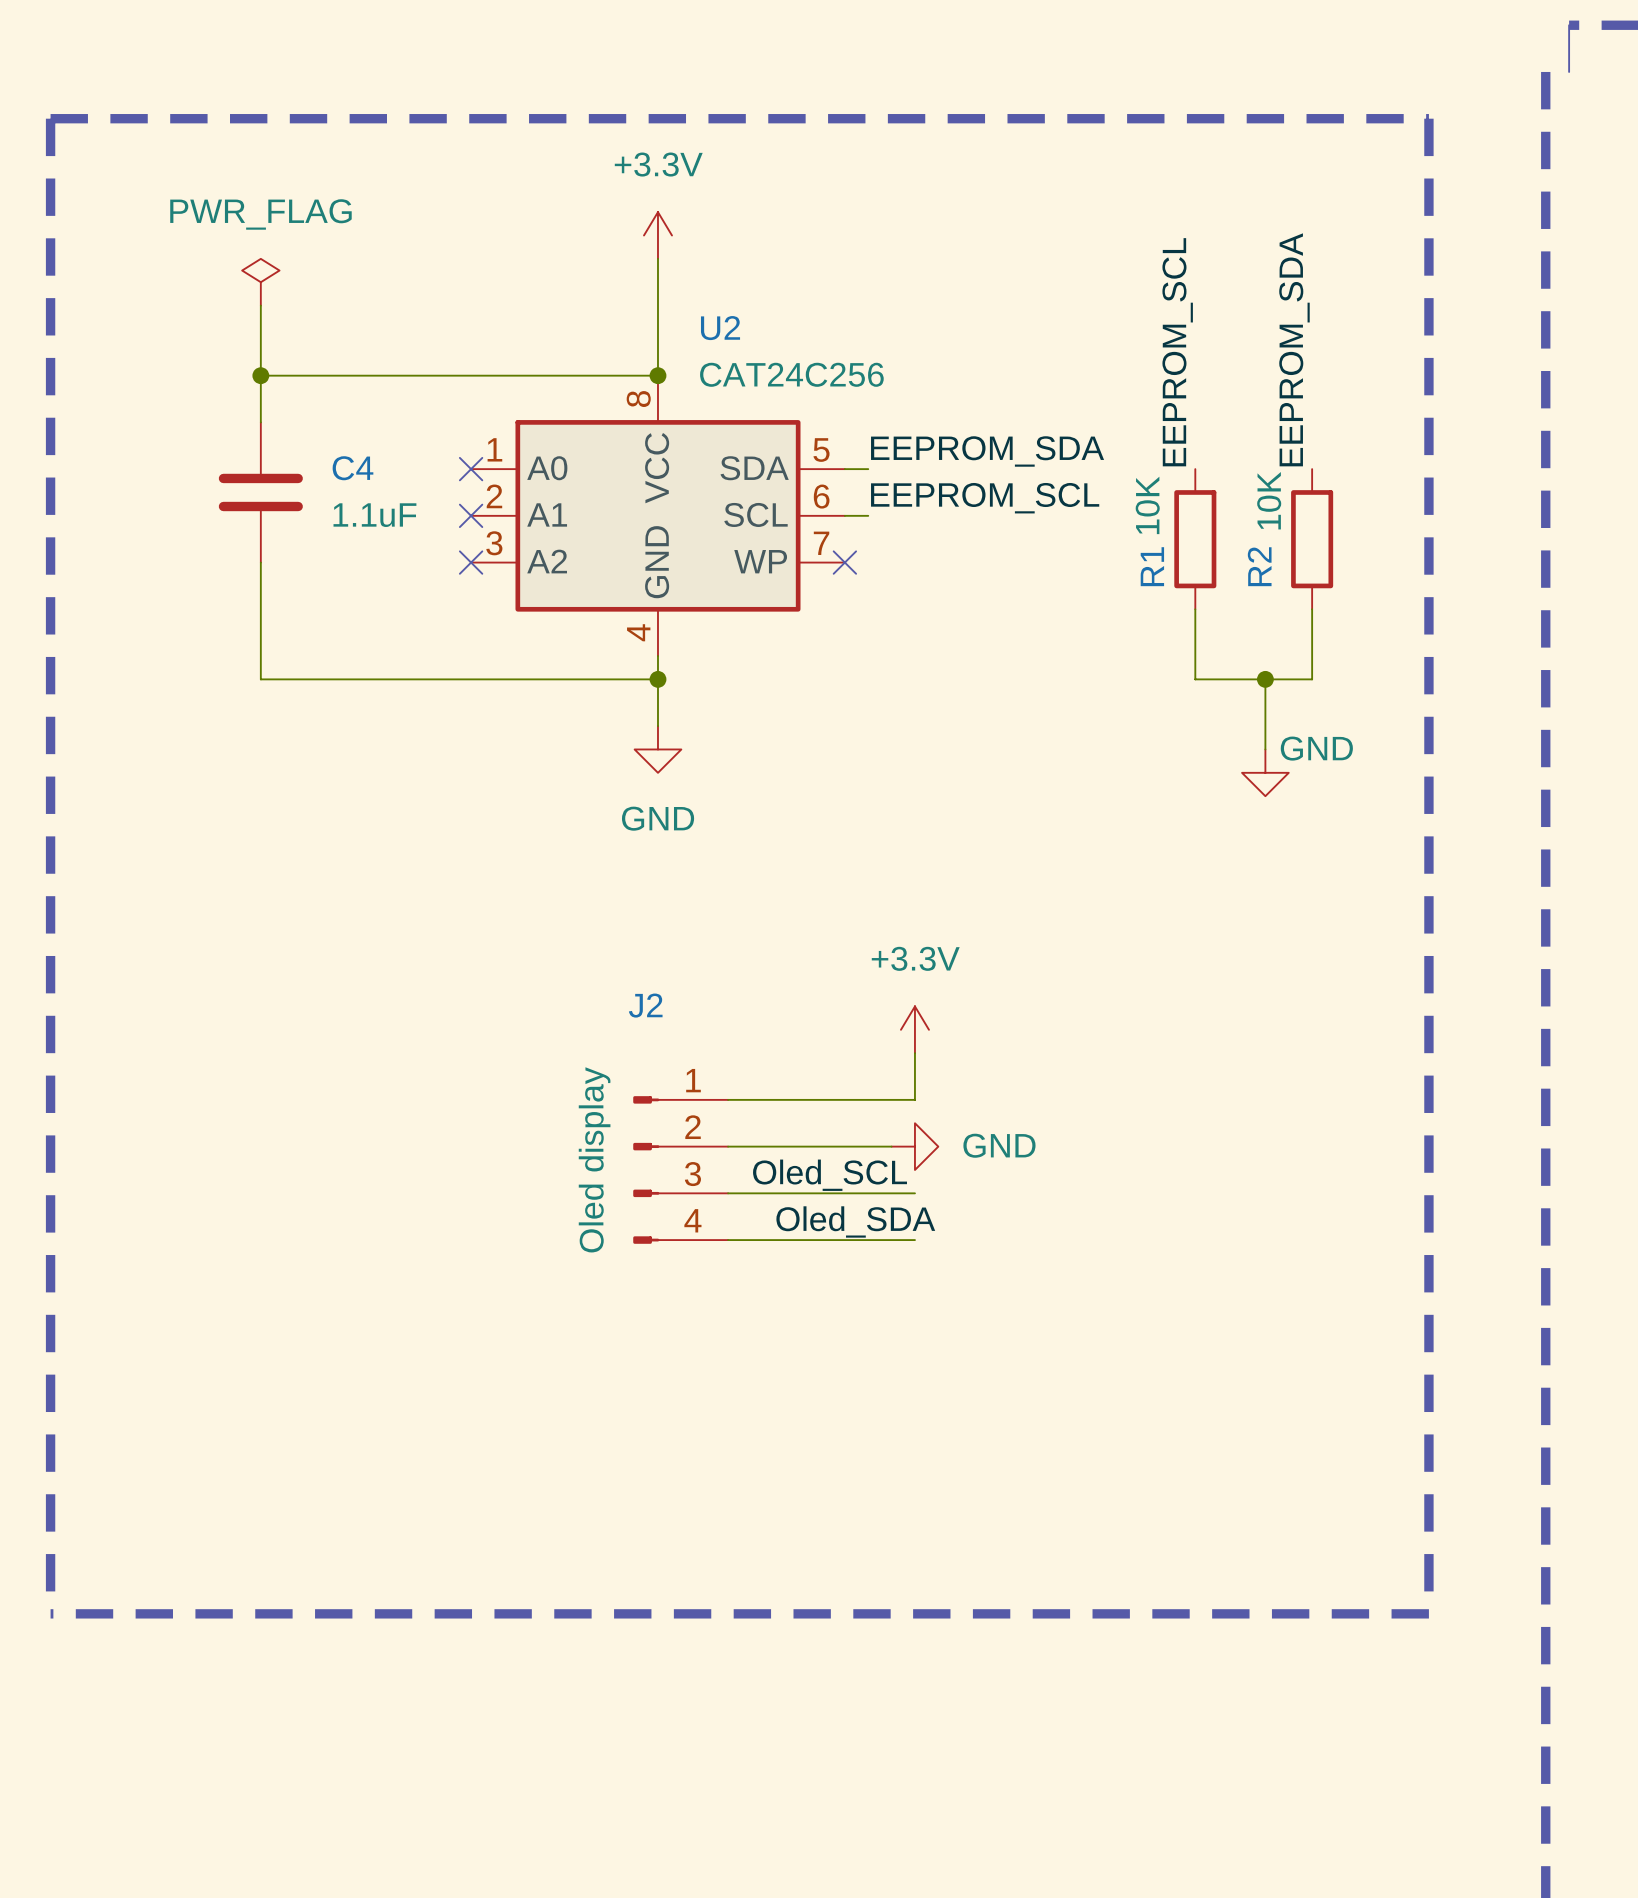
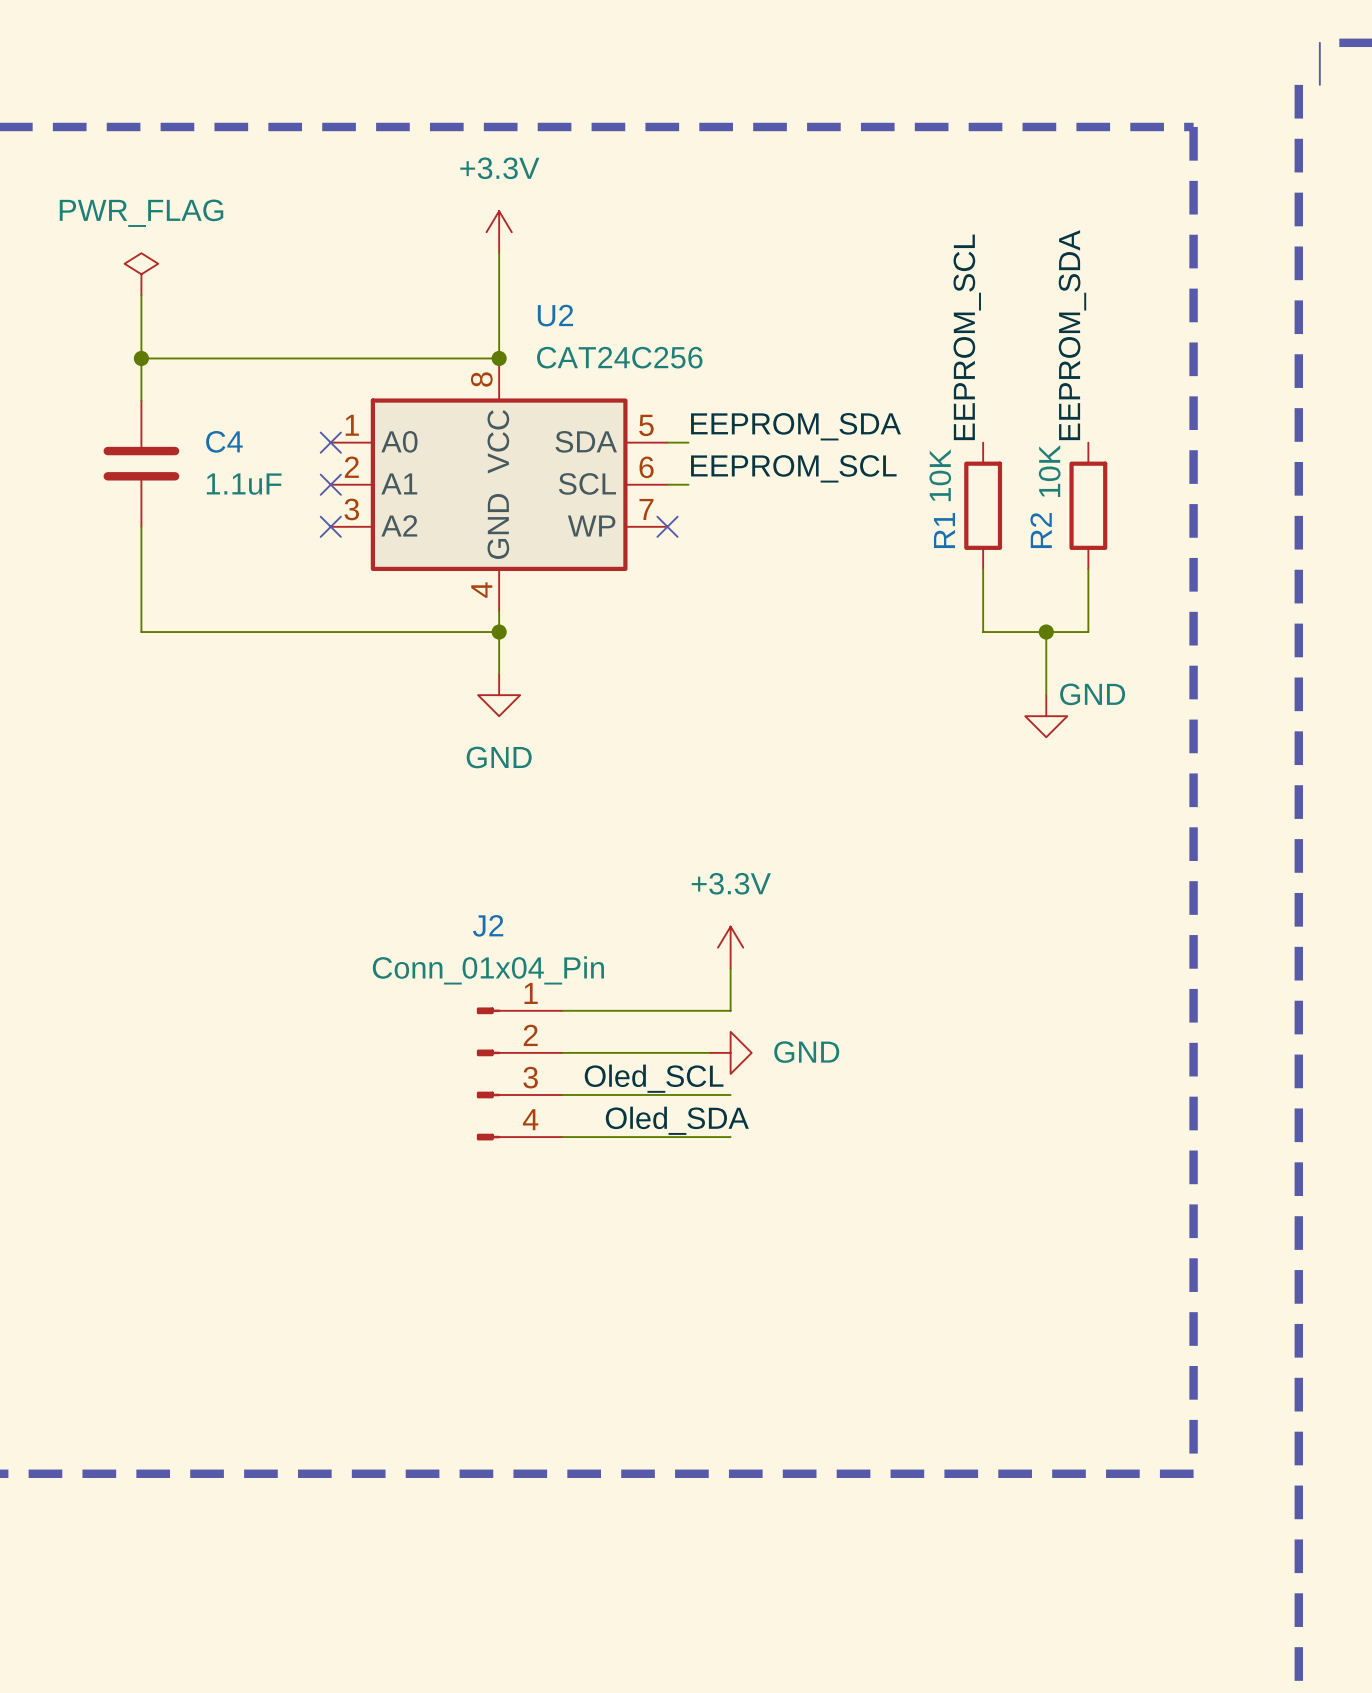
J2 value: Oled display (594, 1159) -> Conn_01x04_Pin (488, 970)

